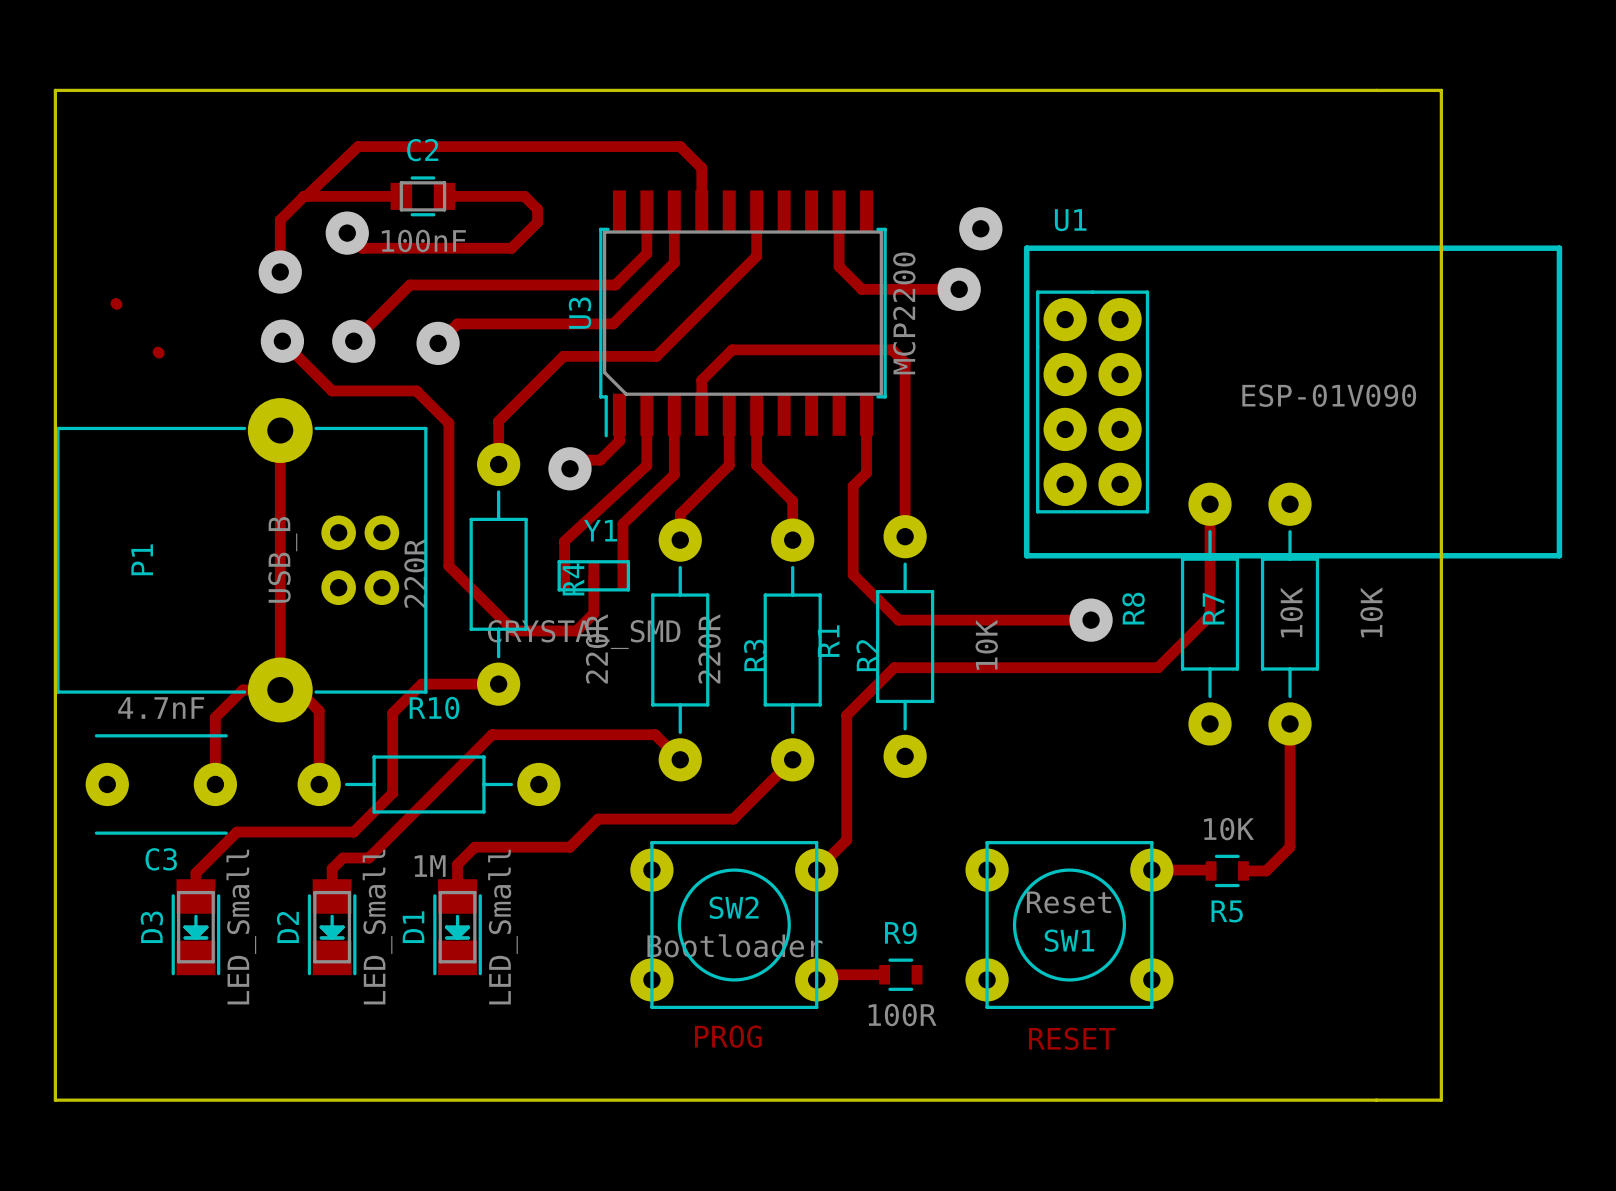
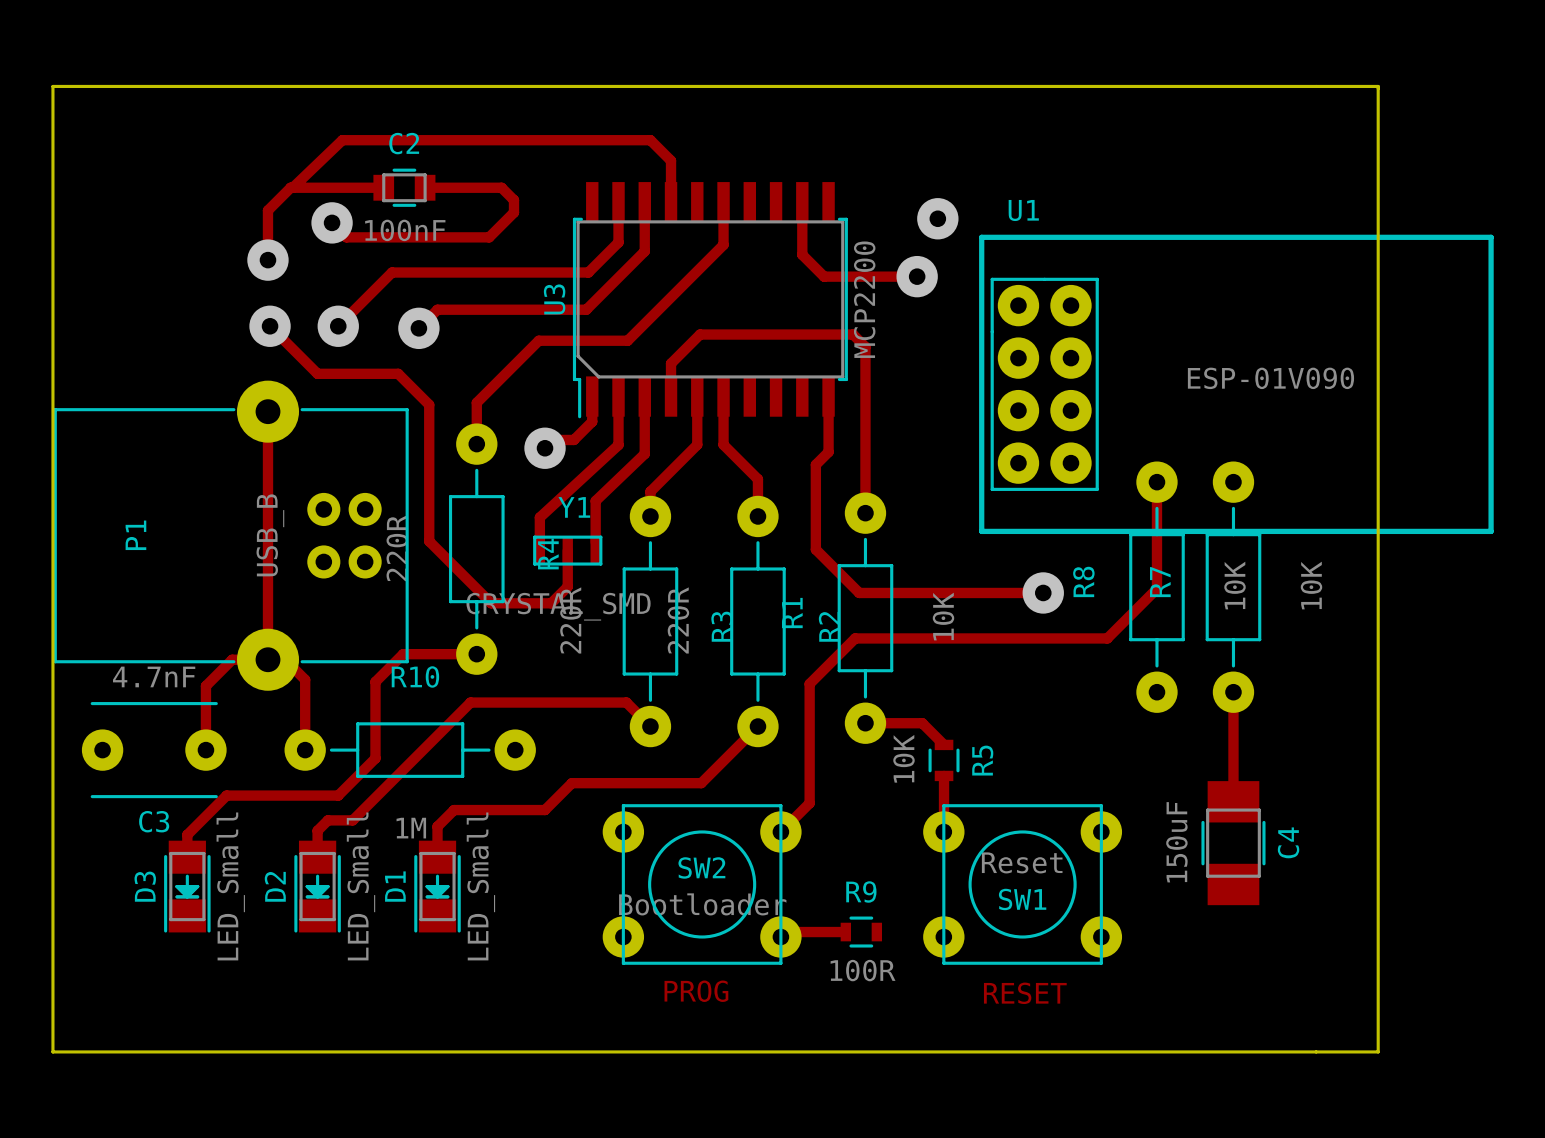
track: (115, 303) (117, 304) -> none
track: (158, 352) (159, 353) -> none
track: none -> (865, 723) (922, 723) (944, 744)
track: none -> (944, 775) (944, 831)
R5 value position: 10K (1229, 829) -> 10K (903, 758)
track: (1290, 838) (1290, 847) (1266, 870) (1243, 870) -> none
track: (1151, 870) (1211, 870) -> none
R5 rotation: 0° (1227, 870) -> 90° clockwise (944, 760)
R5 position: (1227, 870) -> (944, 760)
C4: none -> 150uF (1233, 843)
R5 name position: R5 (1227, 911) -> R5 (982, 760)

